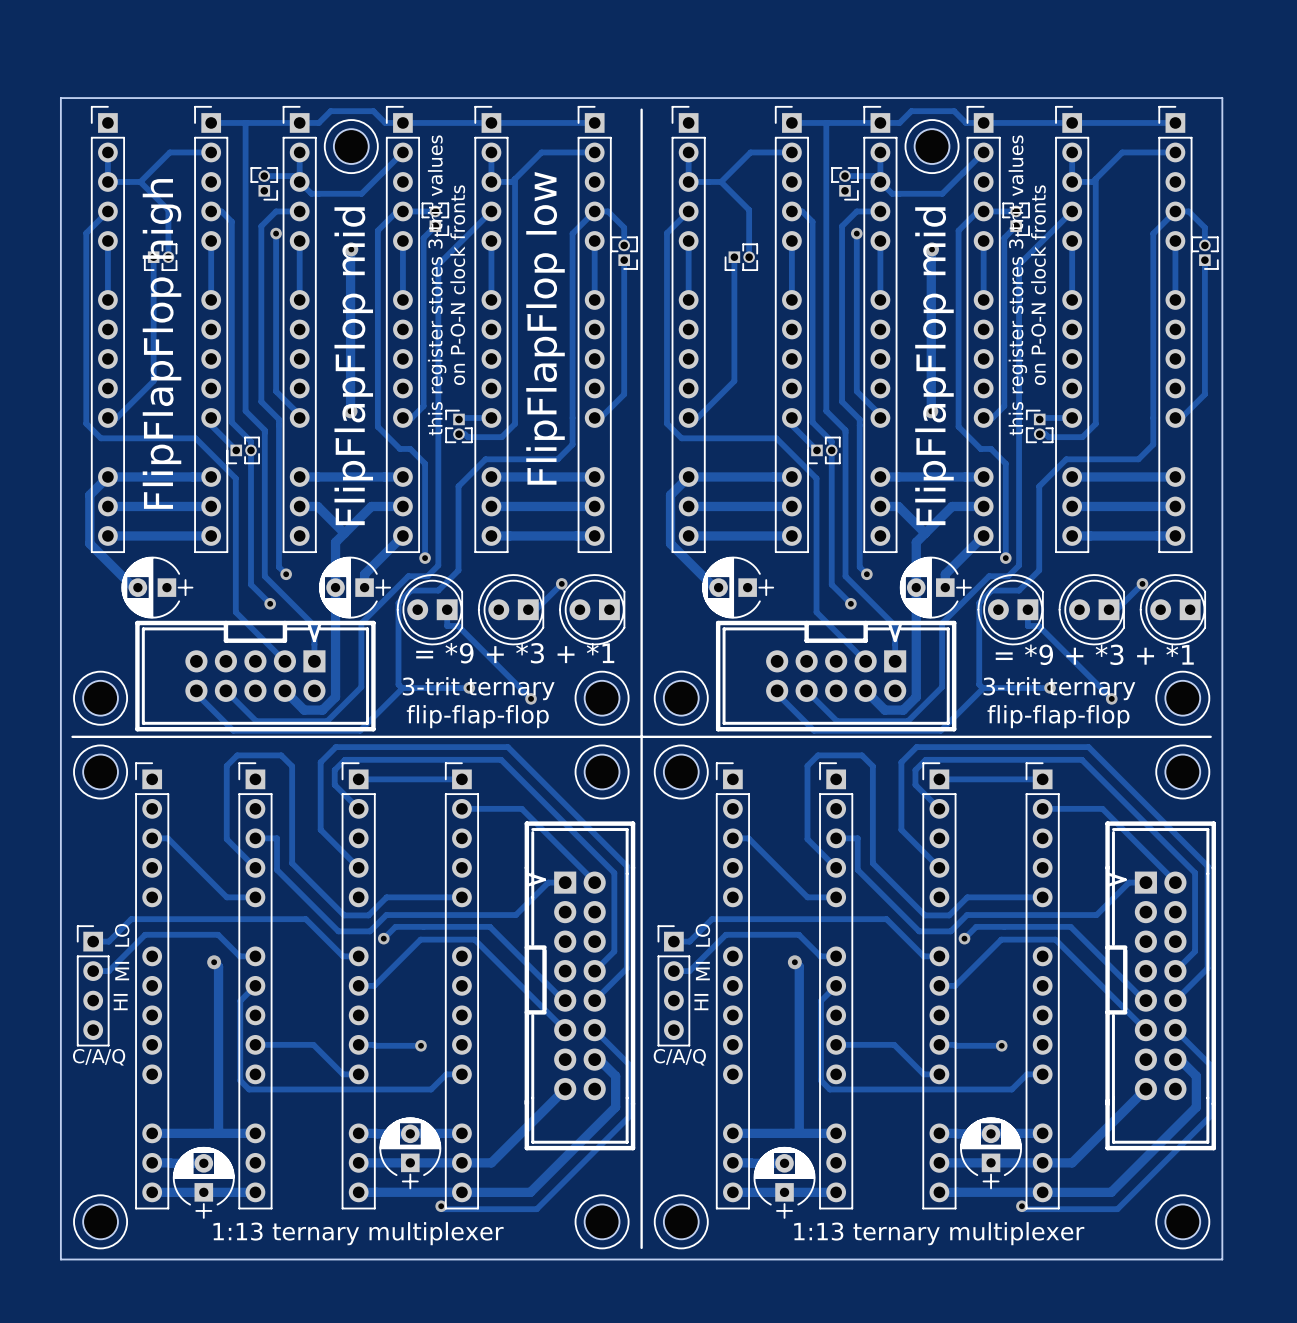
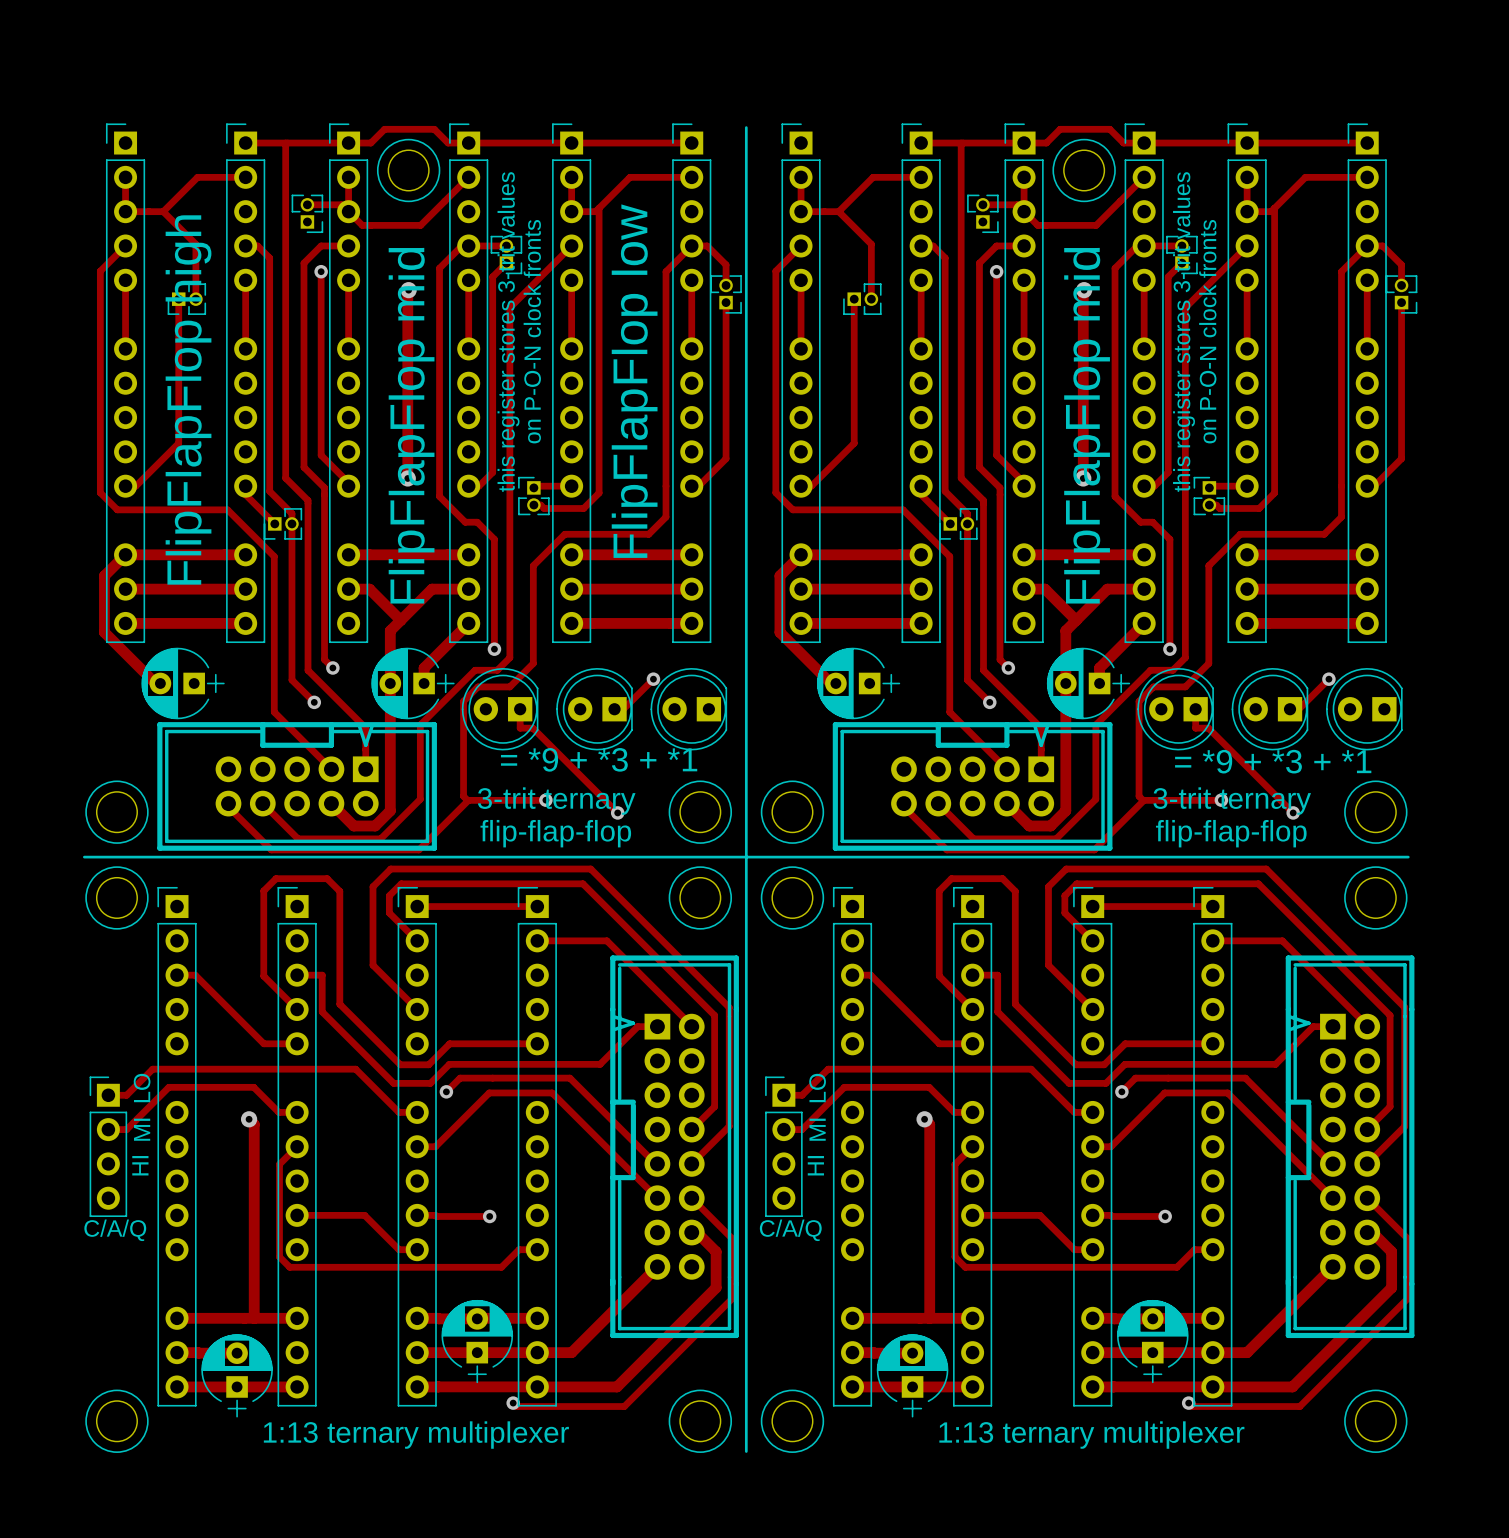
board edge: (60, 98) (1222, 98) (1222, 1259) (60, 1259) (60, 98) -> none

